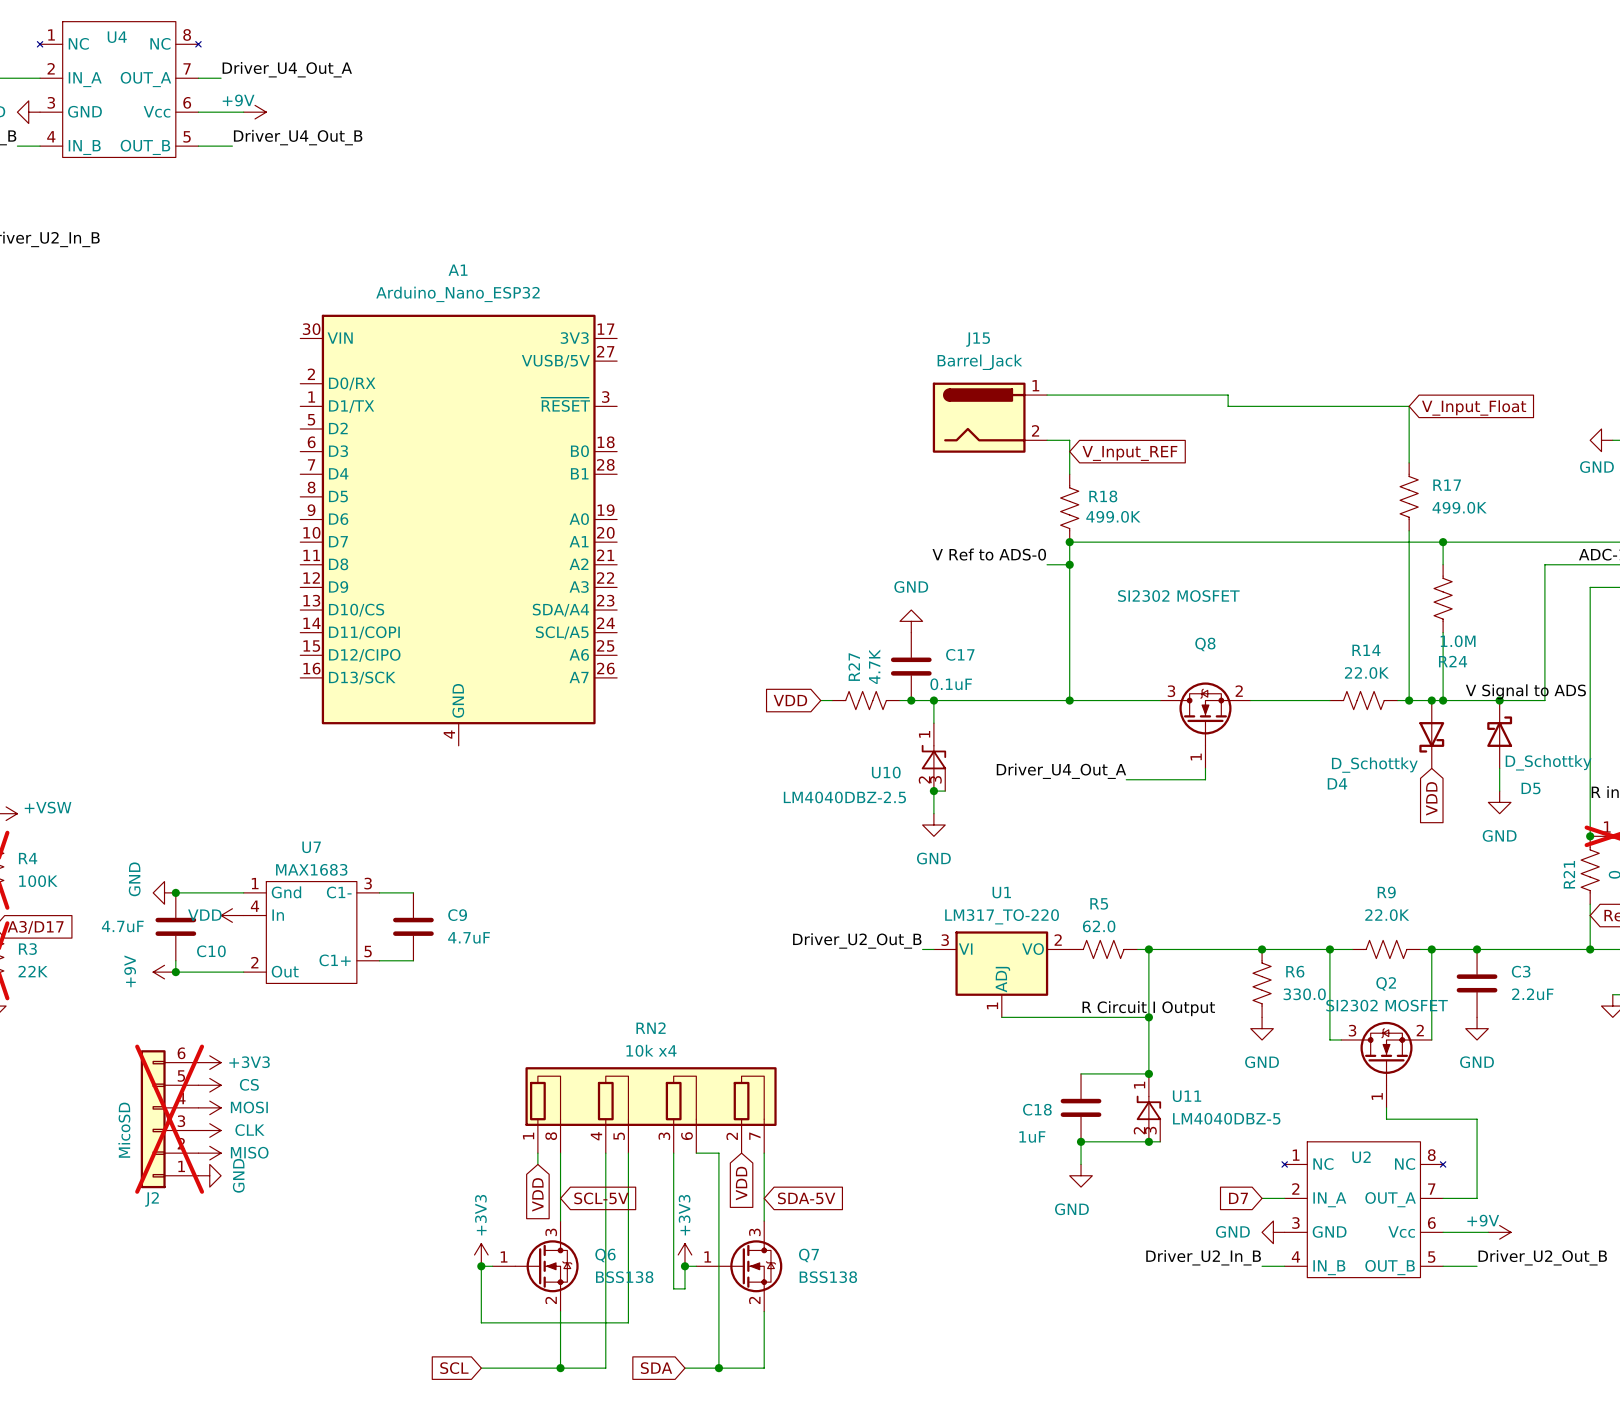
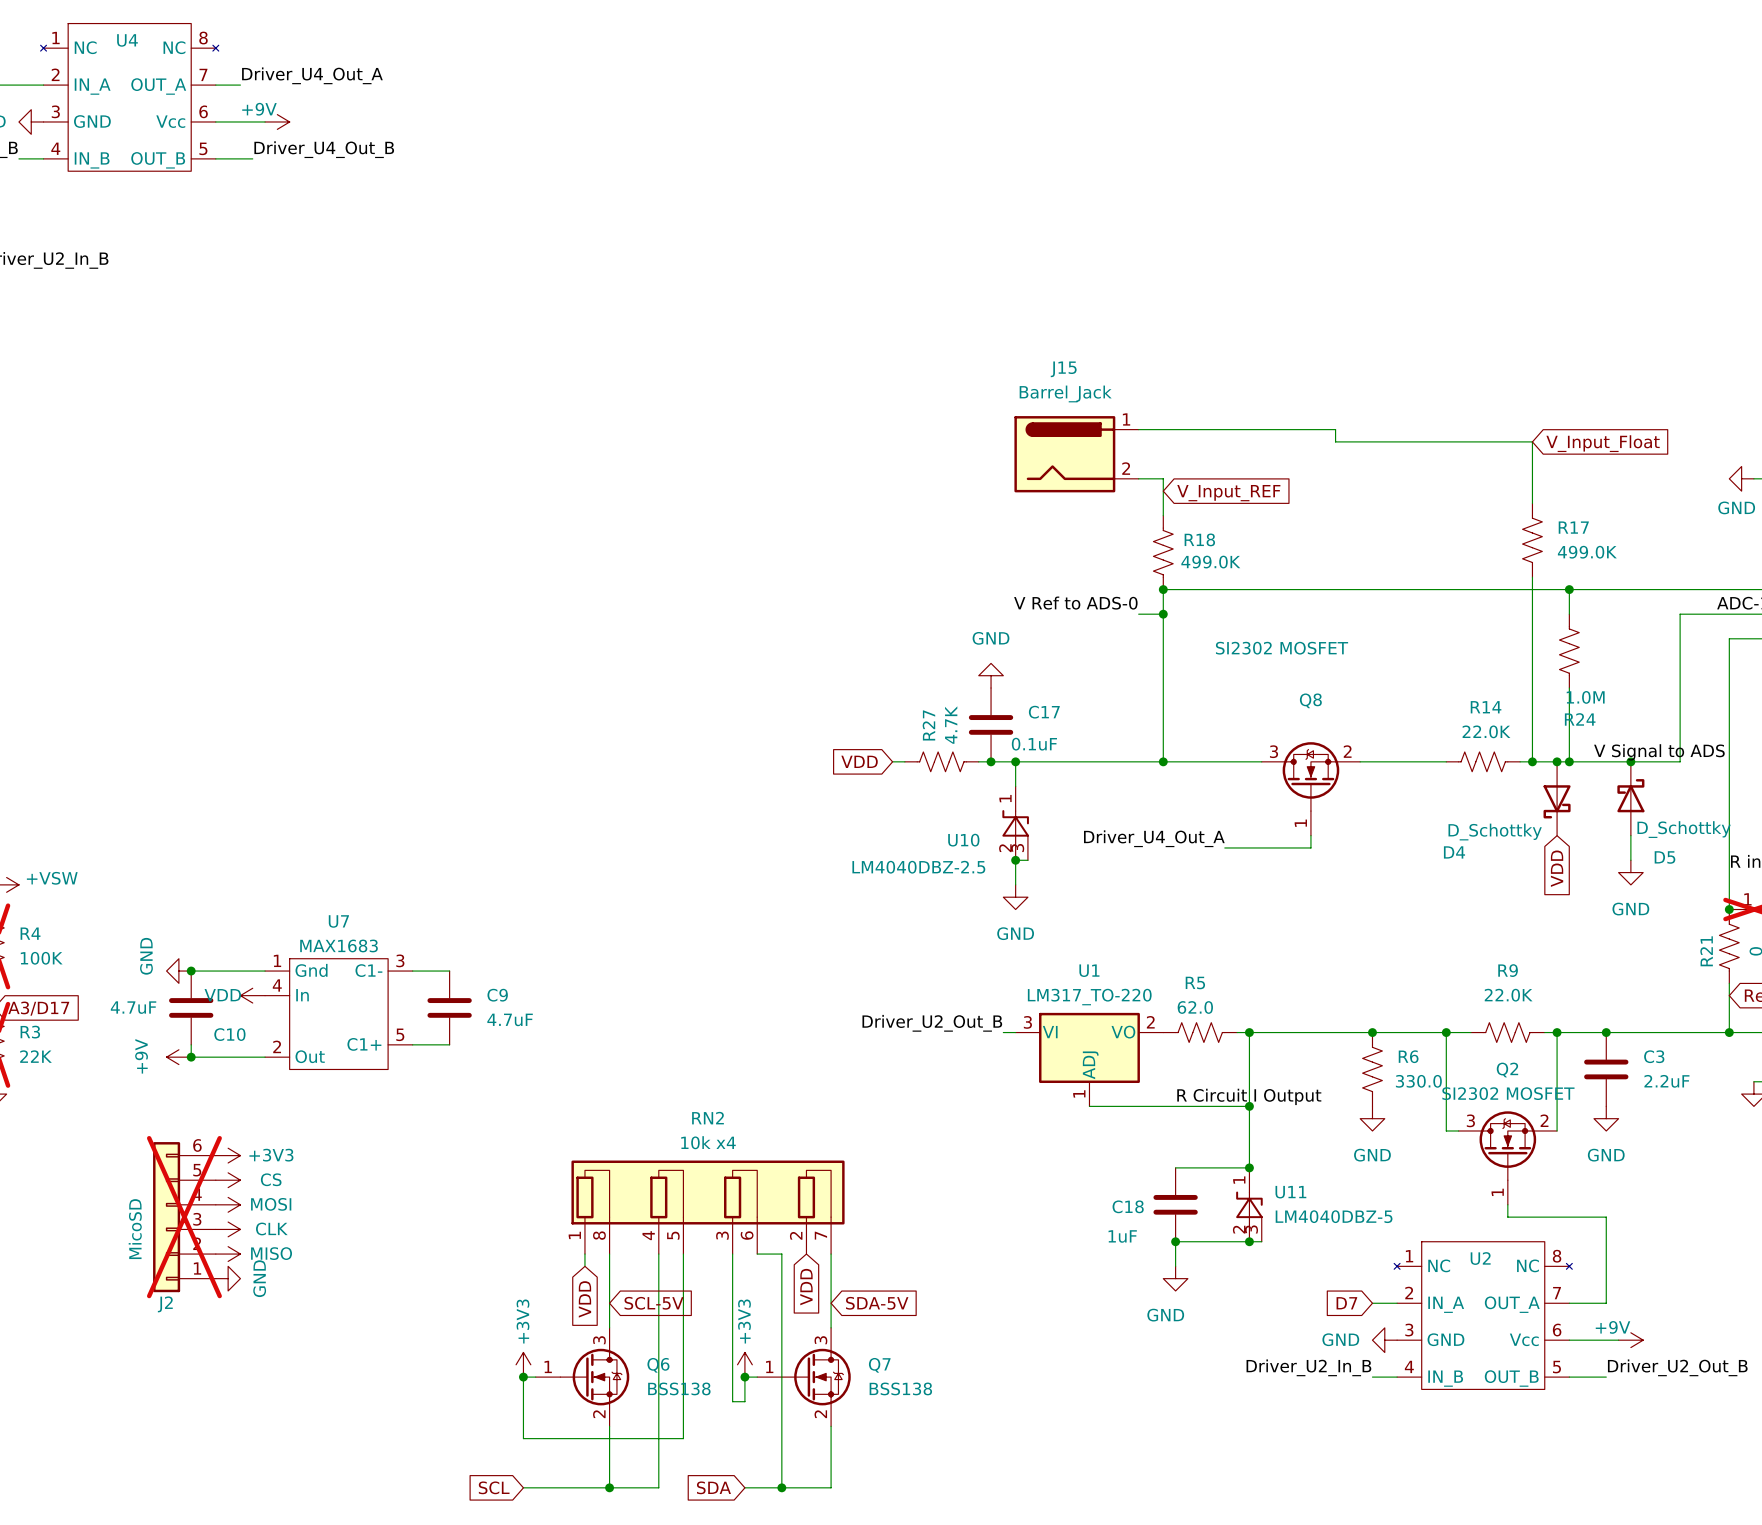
A1: Arduino_Nano_ESP32 (458, 530) -> none

